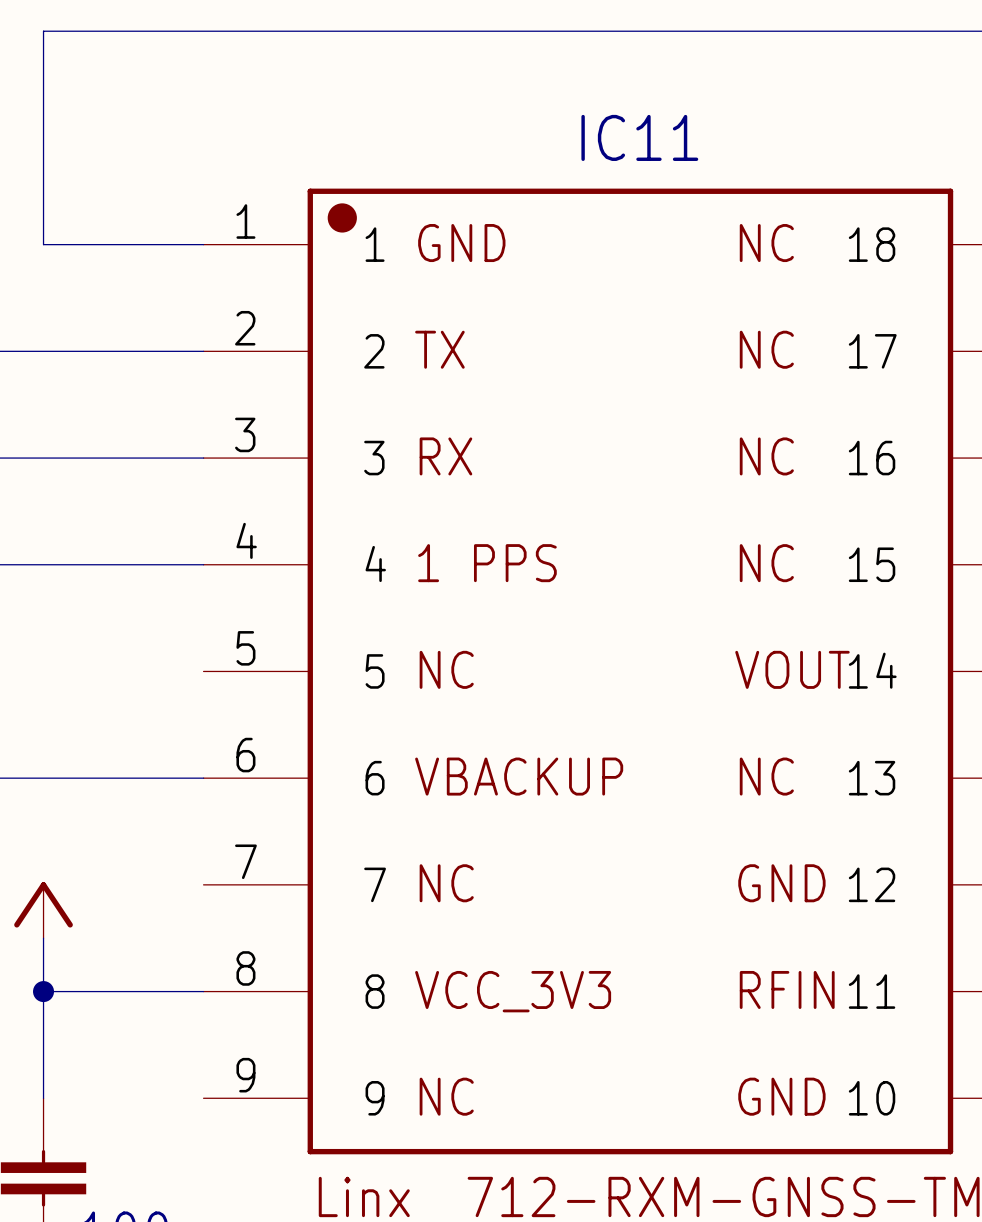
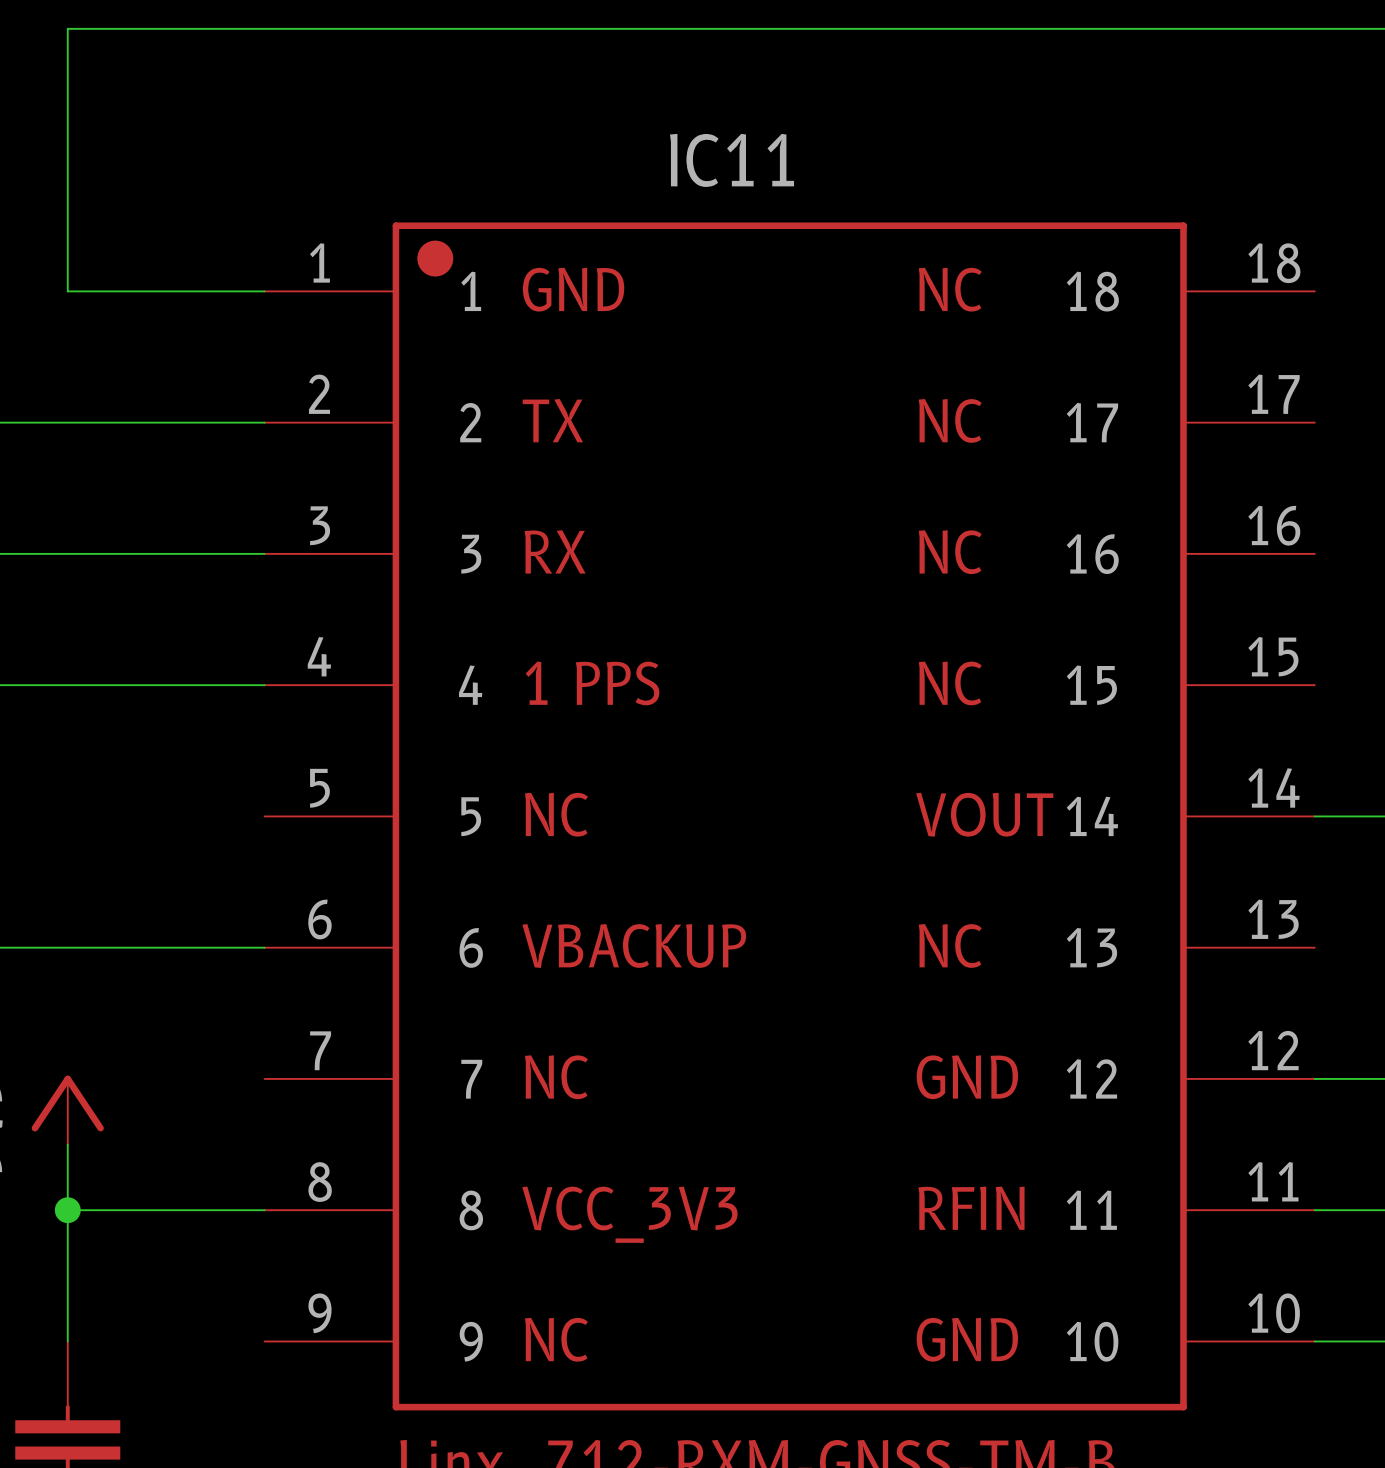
IC11 name position: IC11 (639, 137) -> IC11 (732, 160)

